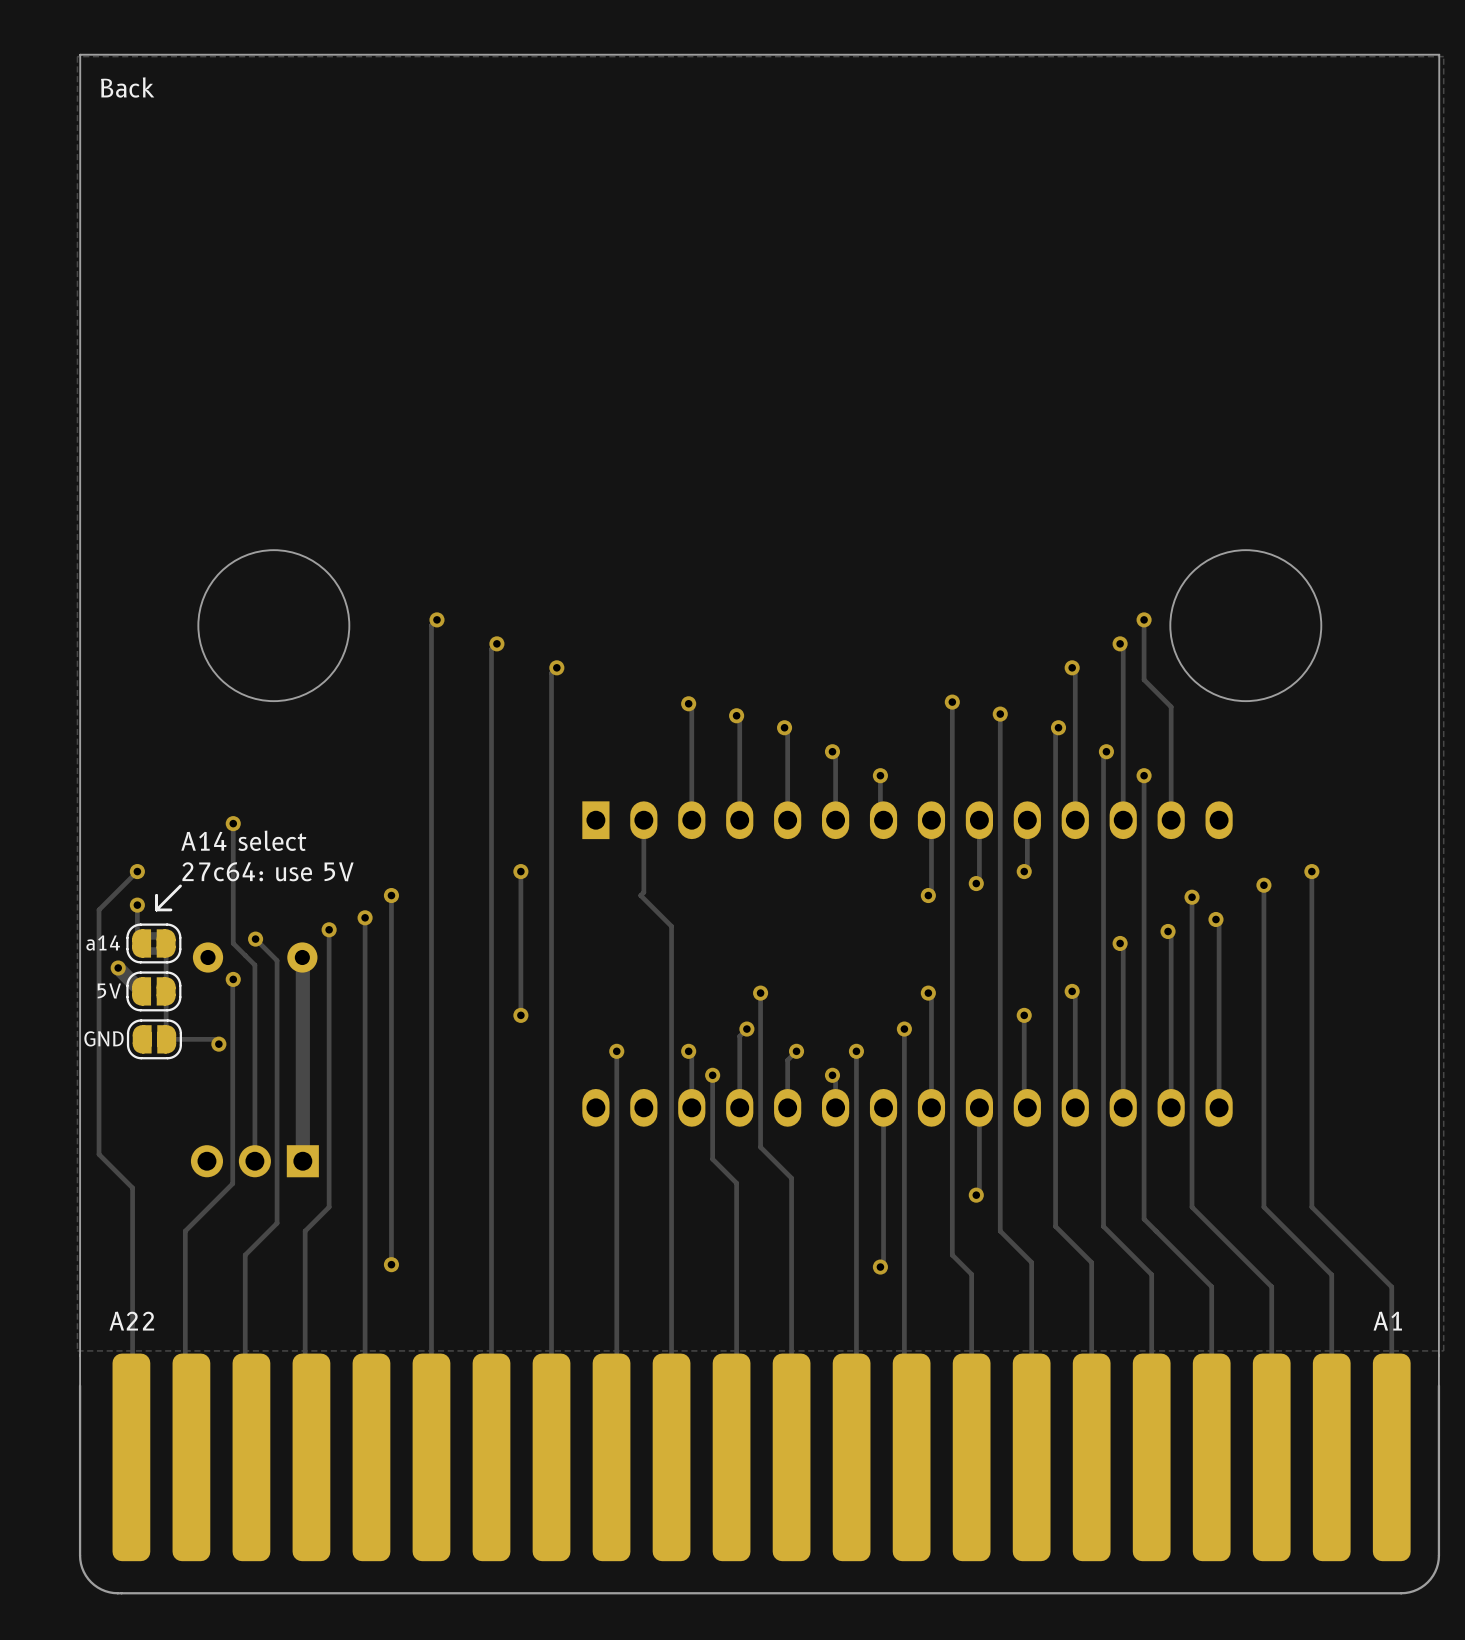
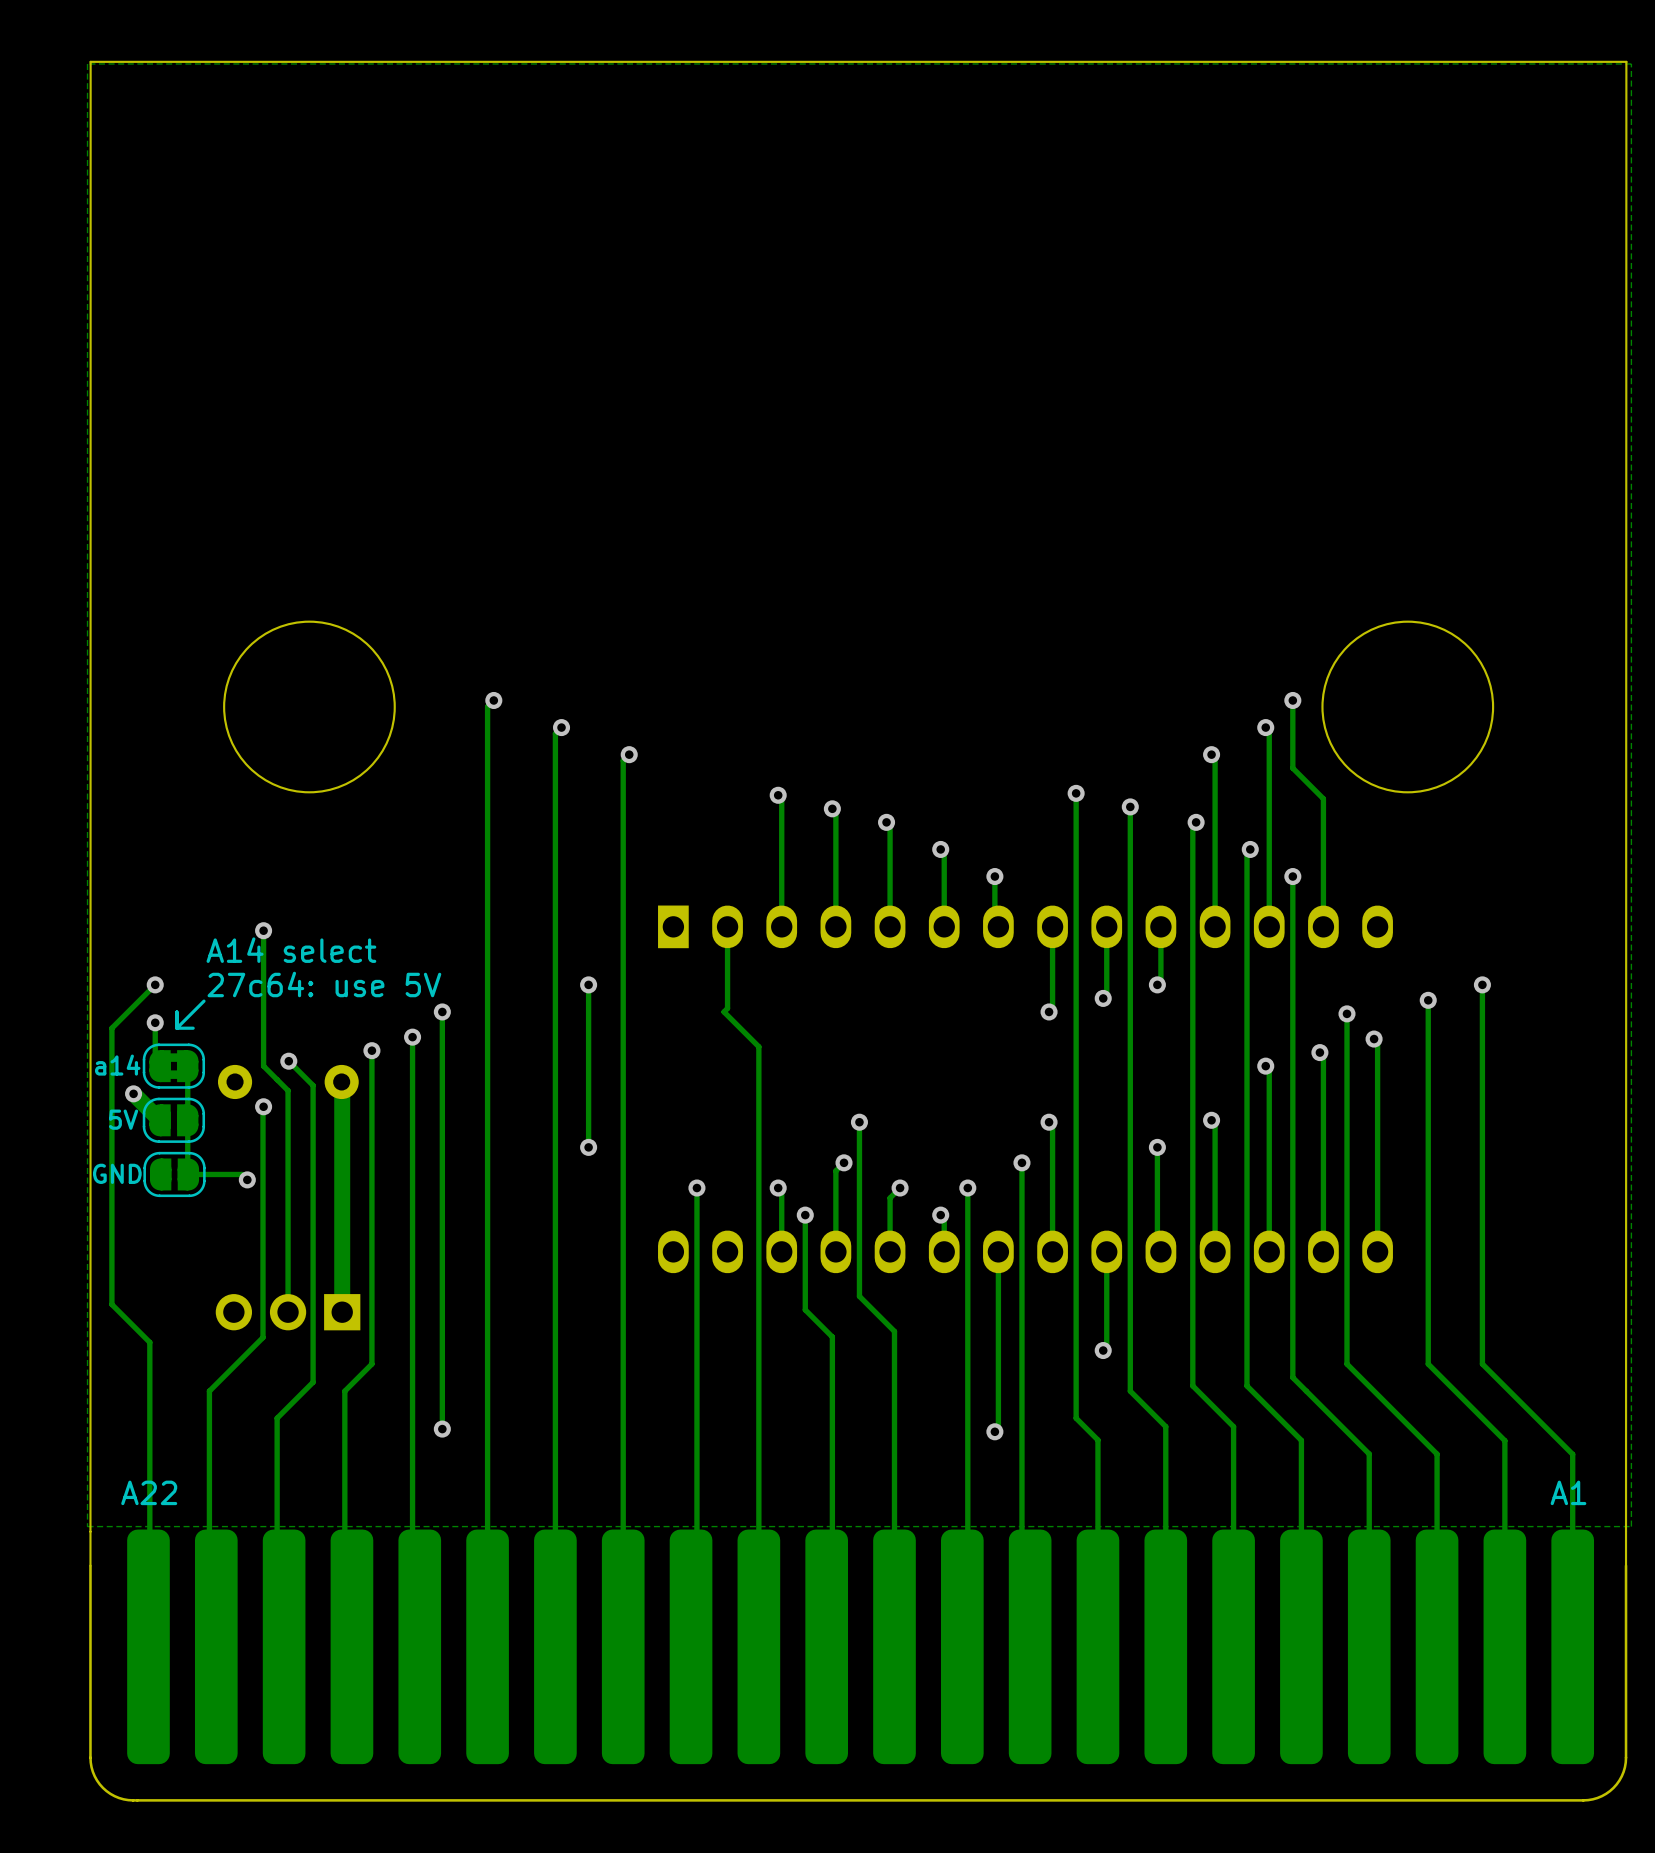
text: Back (127, 87) -> none

